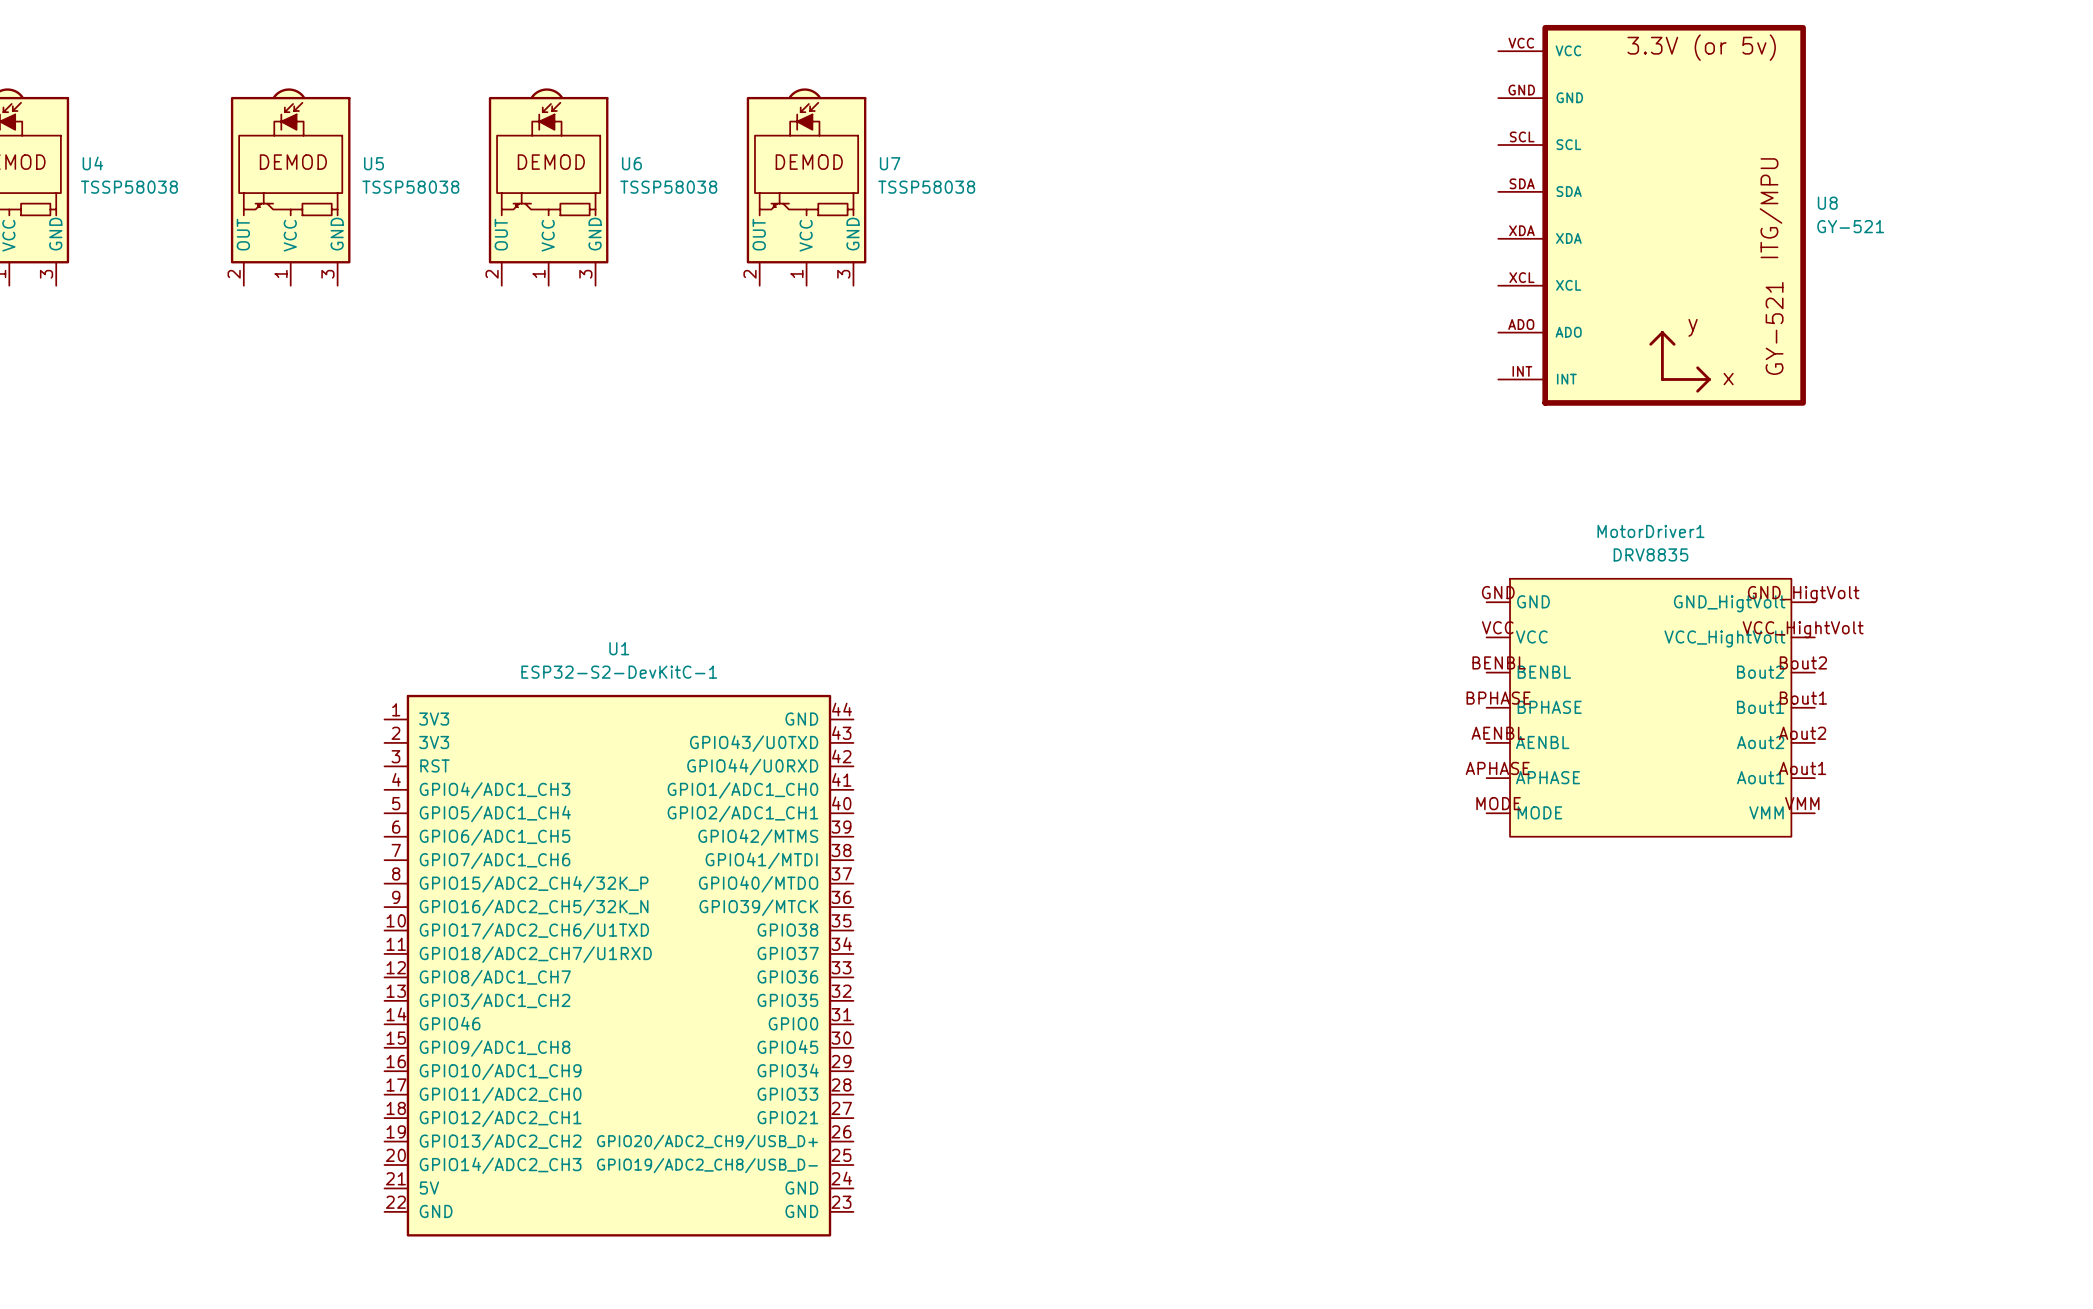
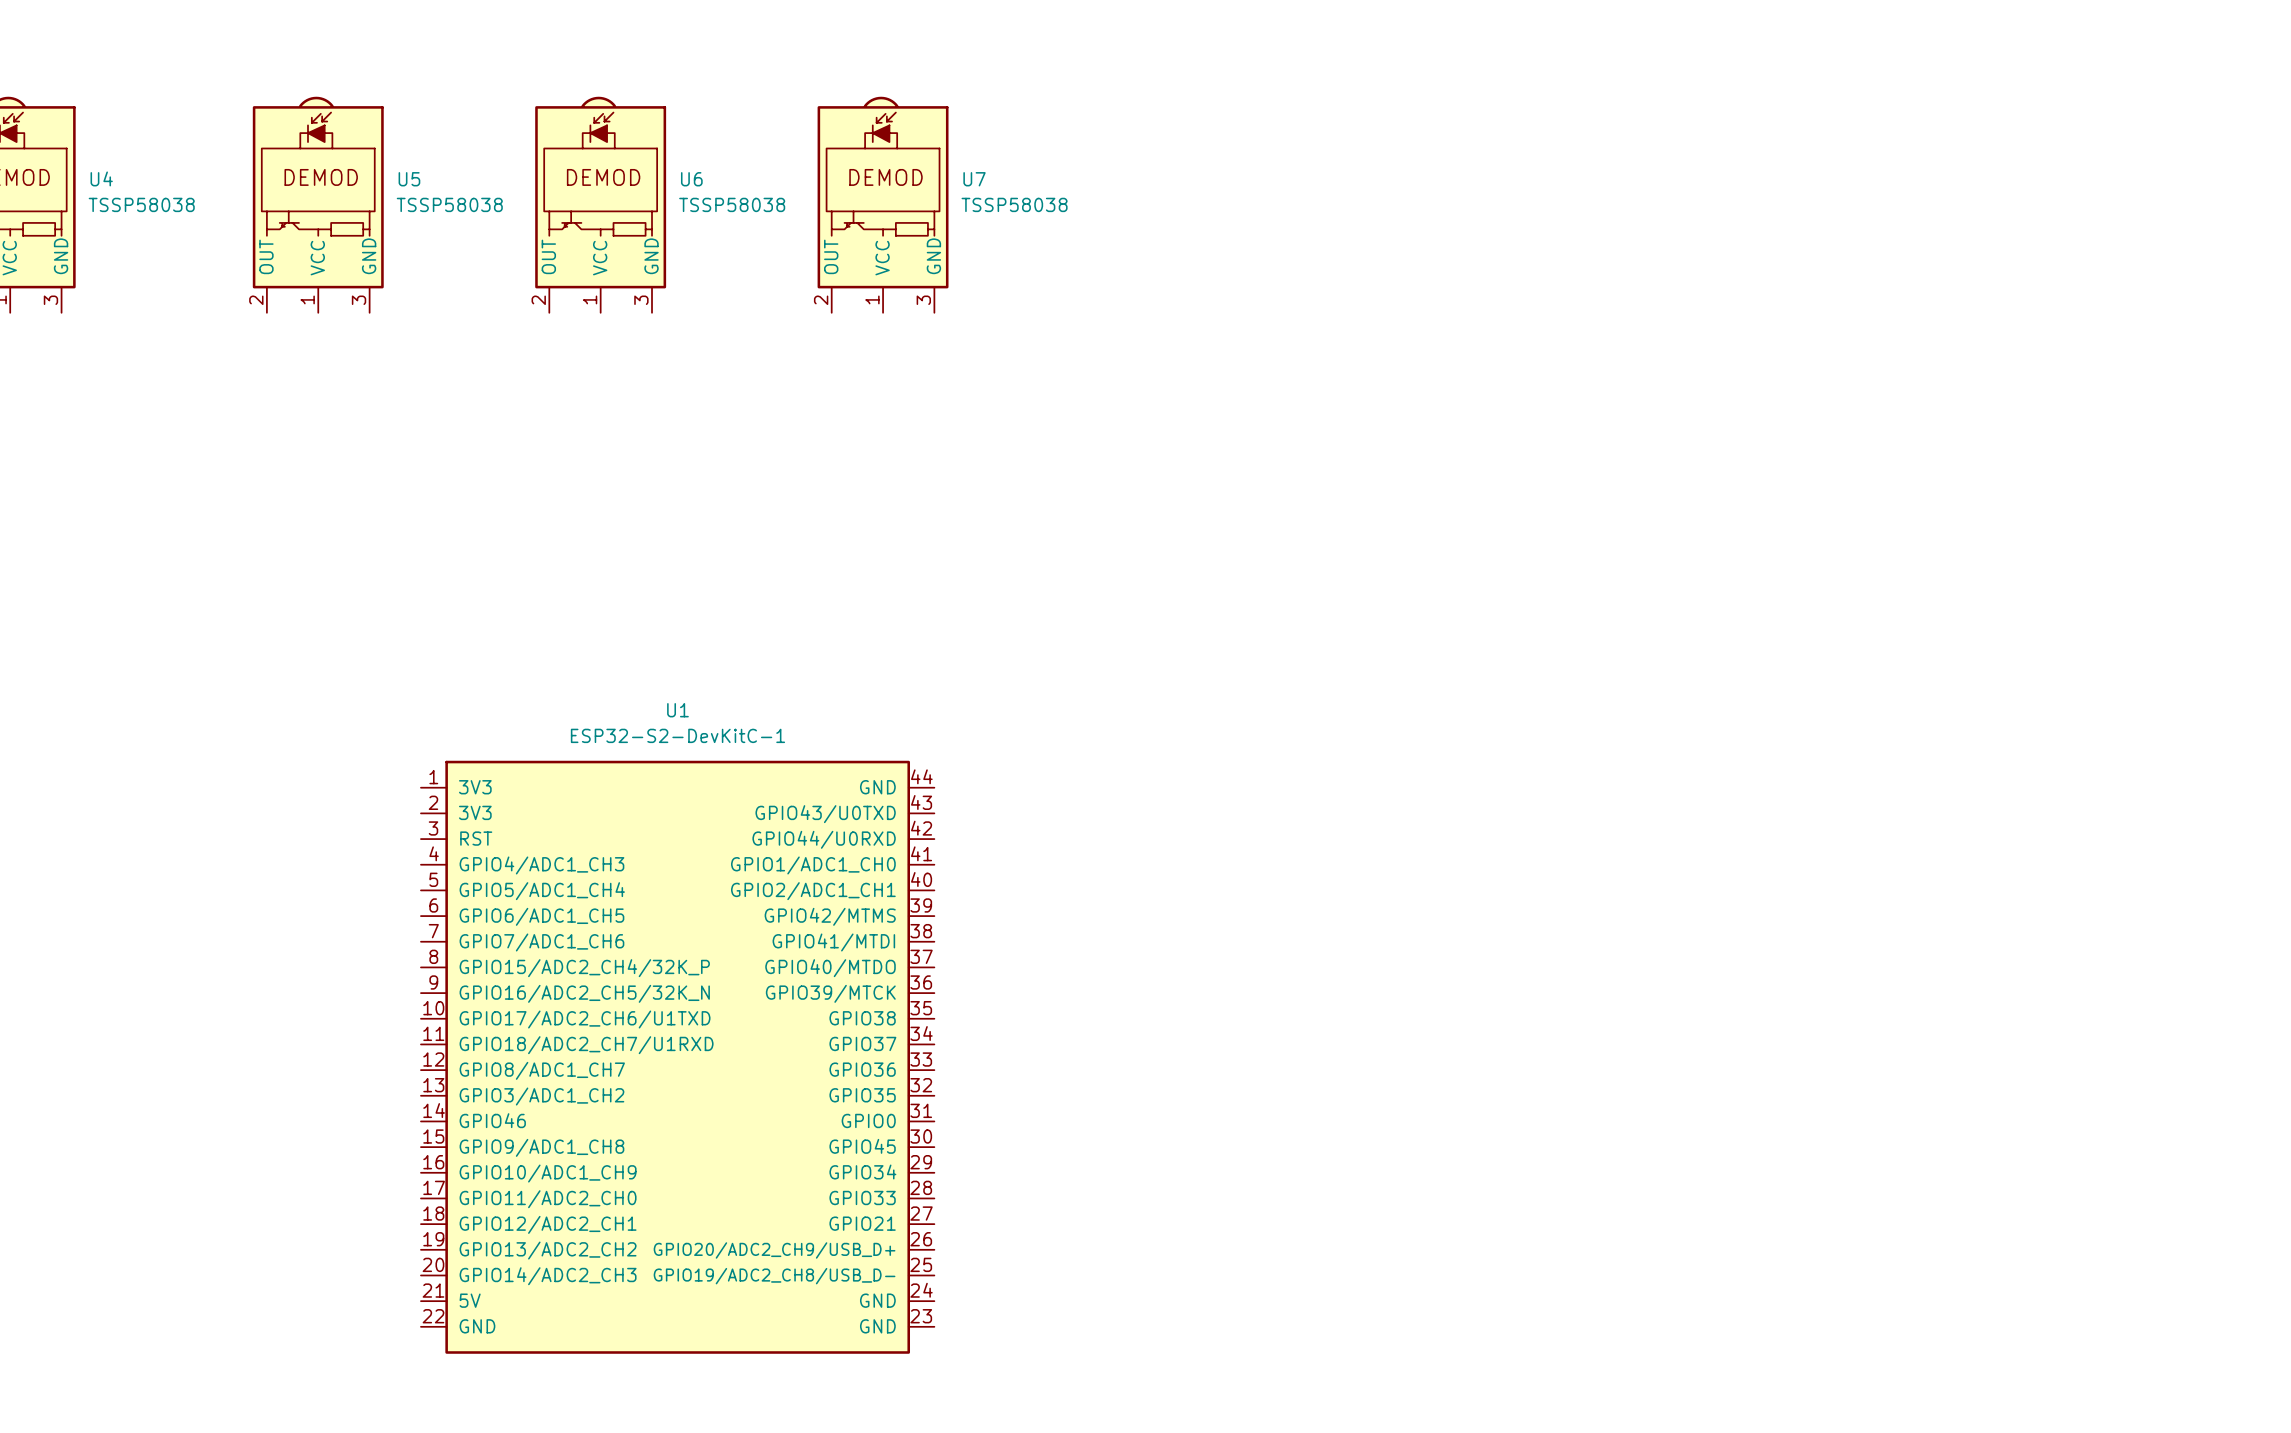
U8: GY-521 (1652, 215) -> none
MotorDriver1: DRV8835 (1650, 707) -> none

